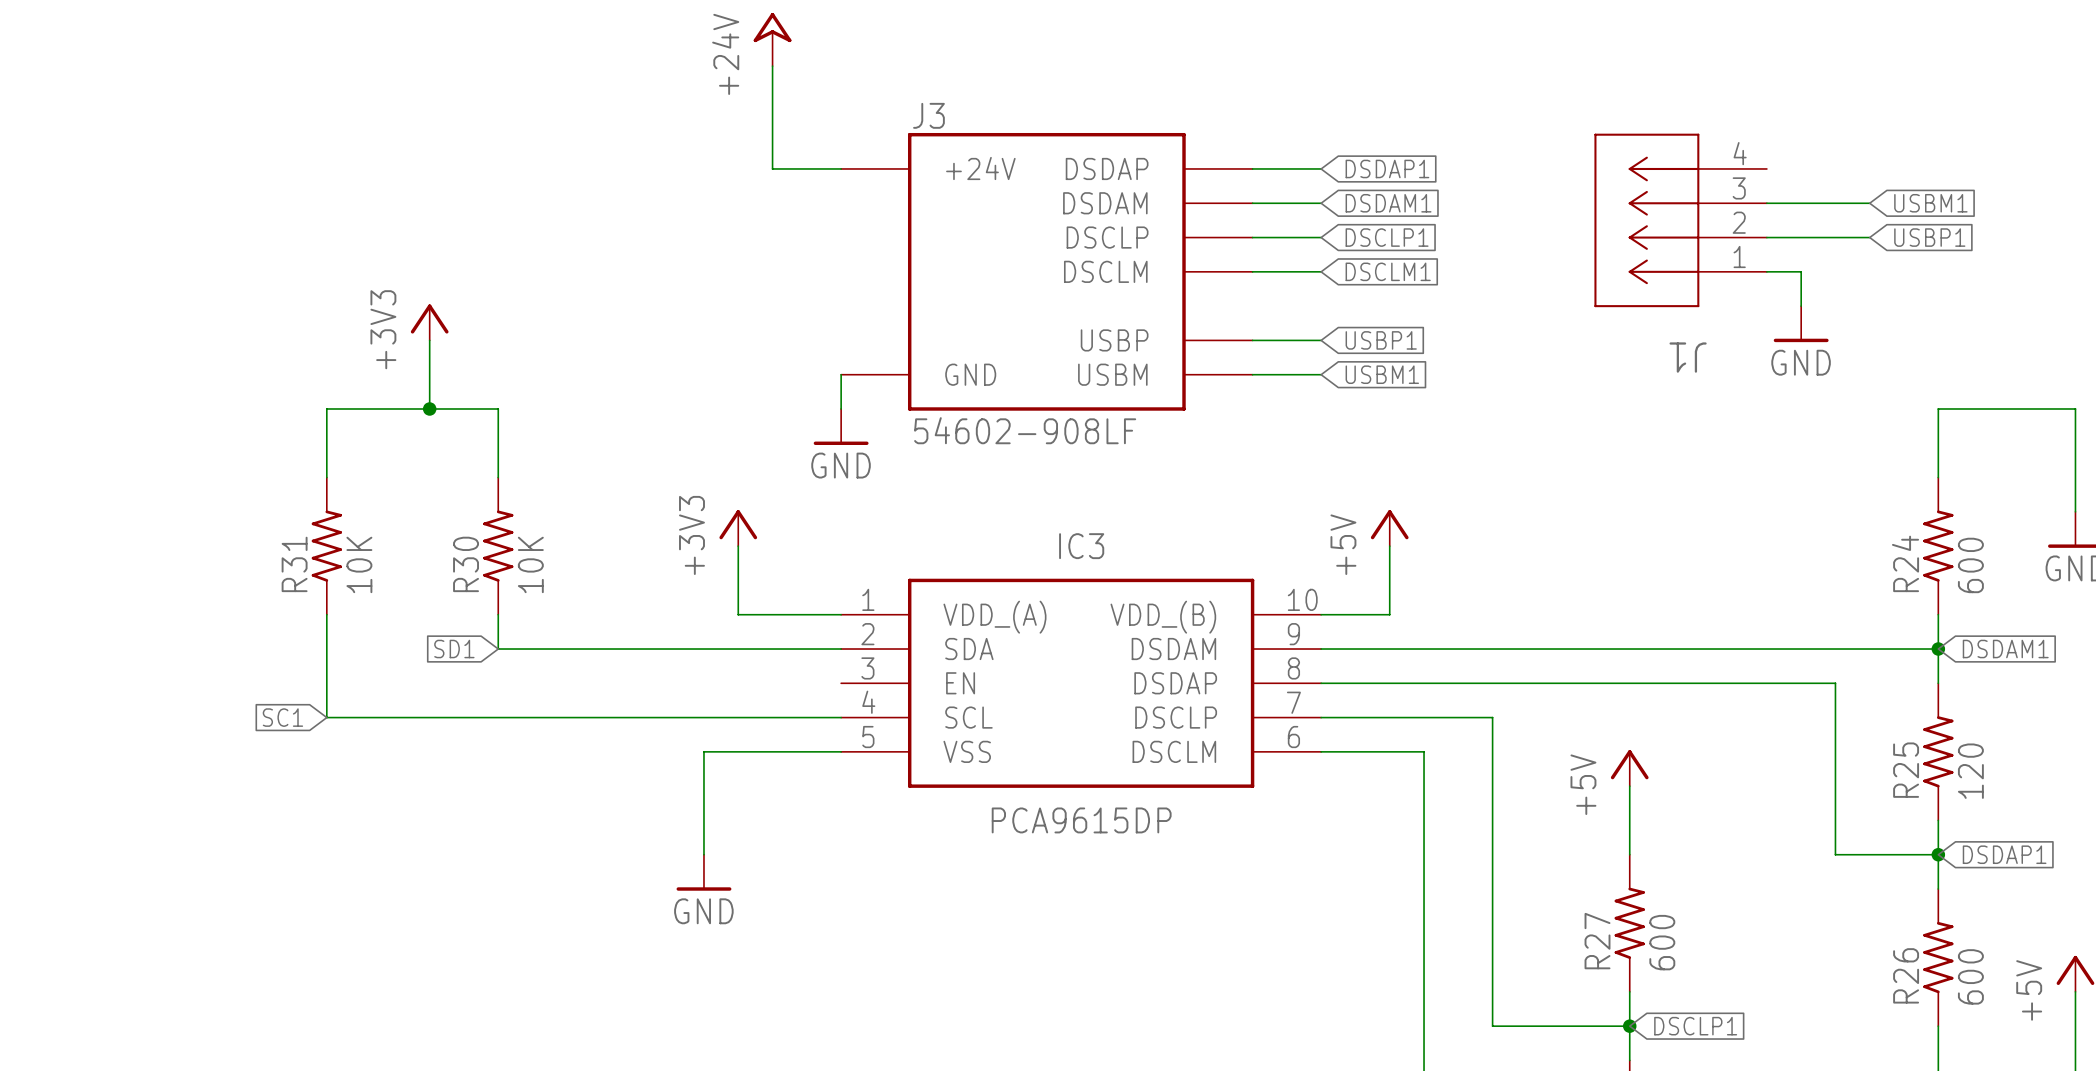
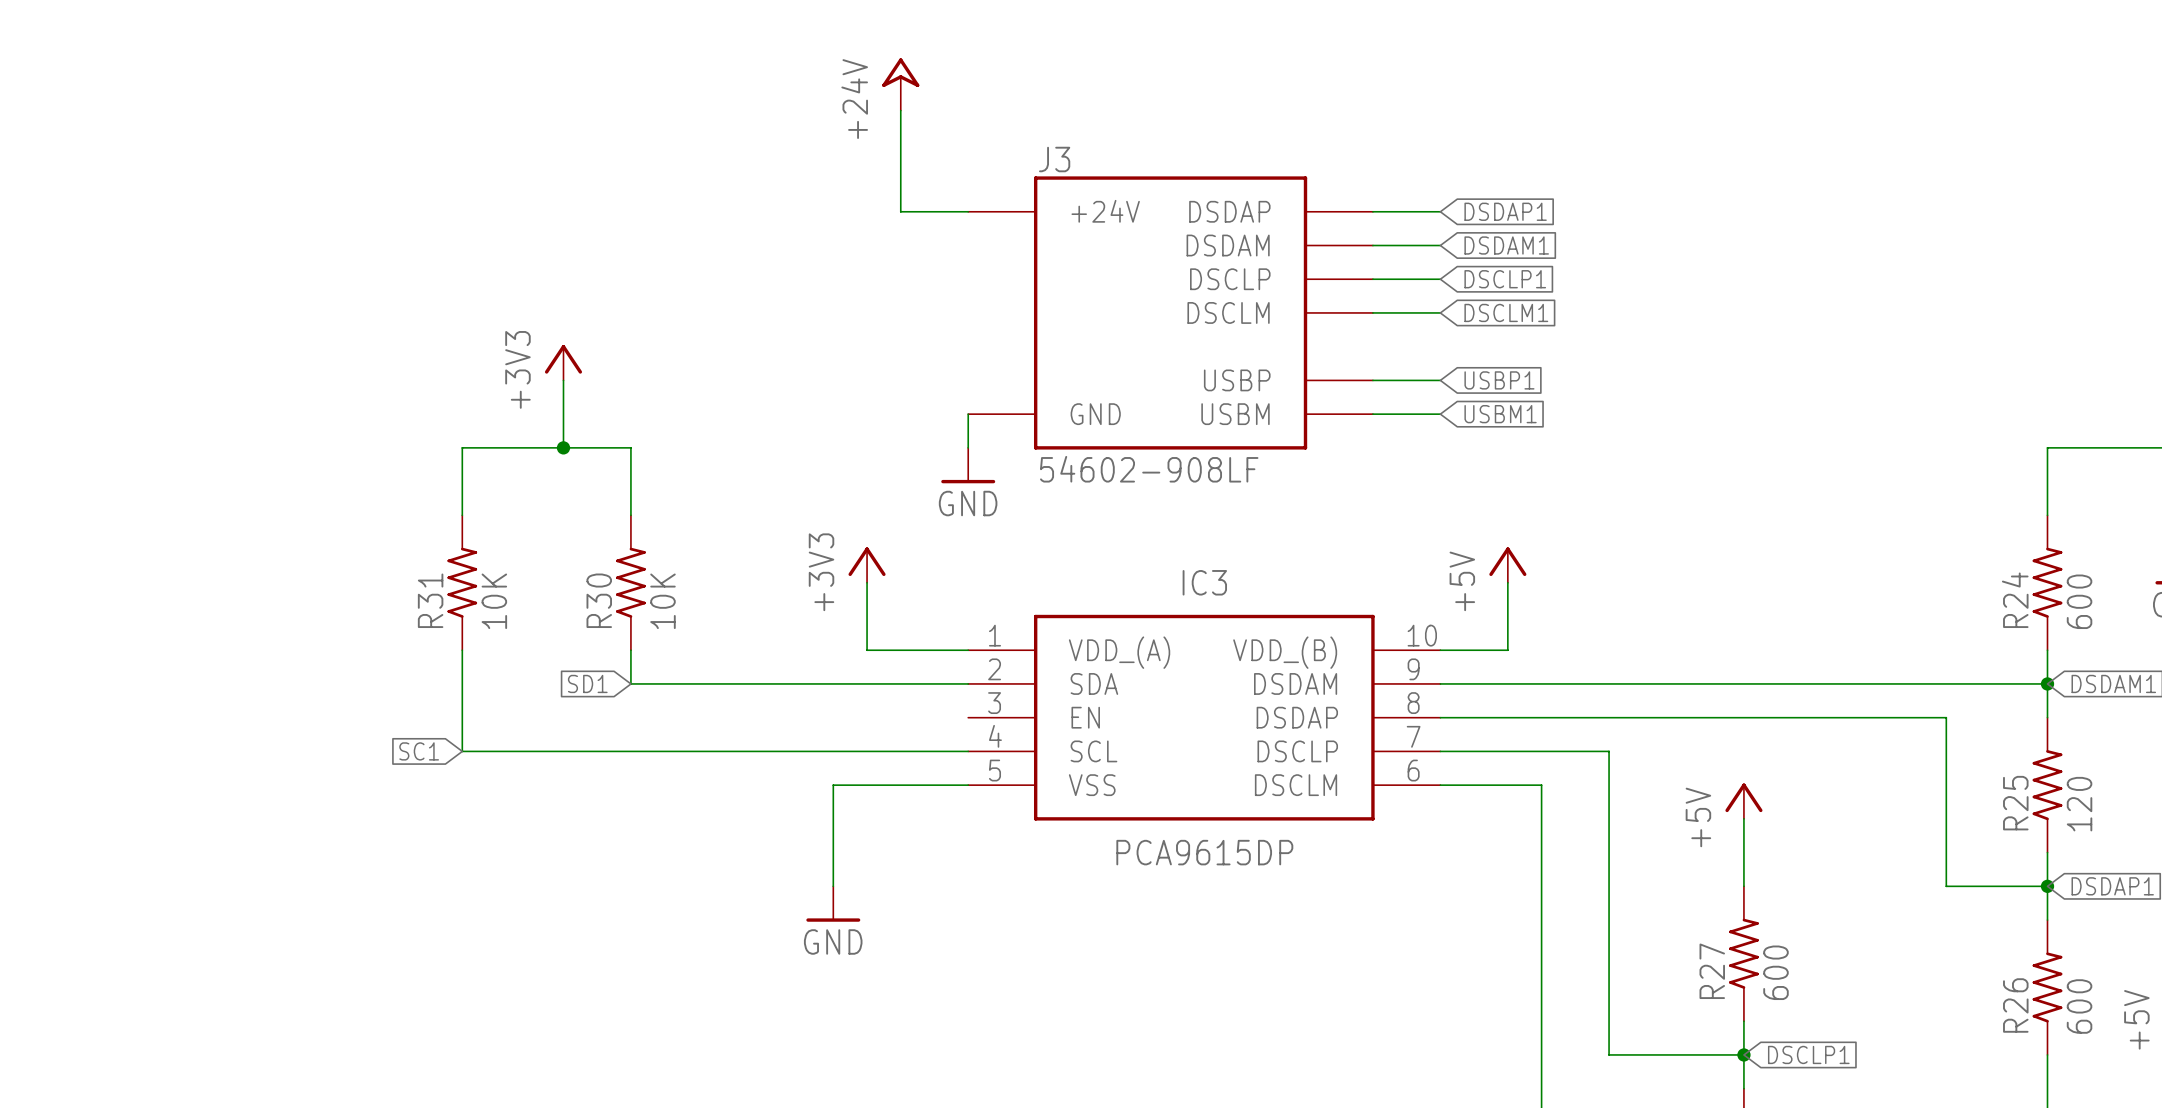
wire: (1766, 203) (1869, 203) -> none
global label: USBM1 (1930, 203) -> none
J1: (1680, 220) -> none
wire: (1766, 237) (1869, 237) -> none
global label: USBP1 (1929, 237) -> none
wire: (1766, 271) (1801, 271) (1801, 306) -> none
power symbol: GND (1801, 324) -> none

